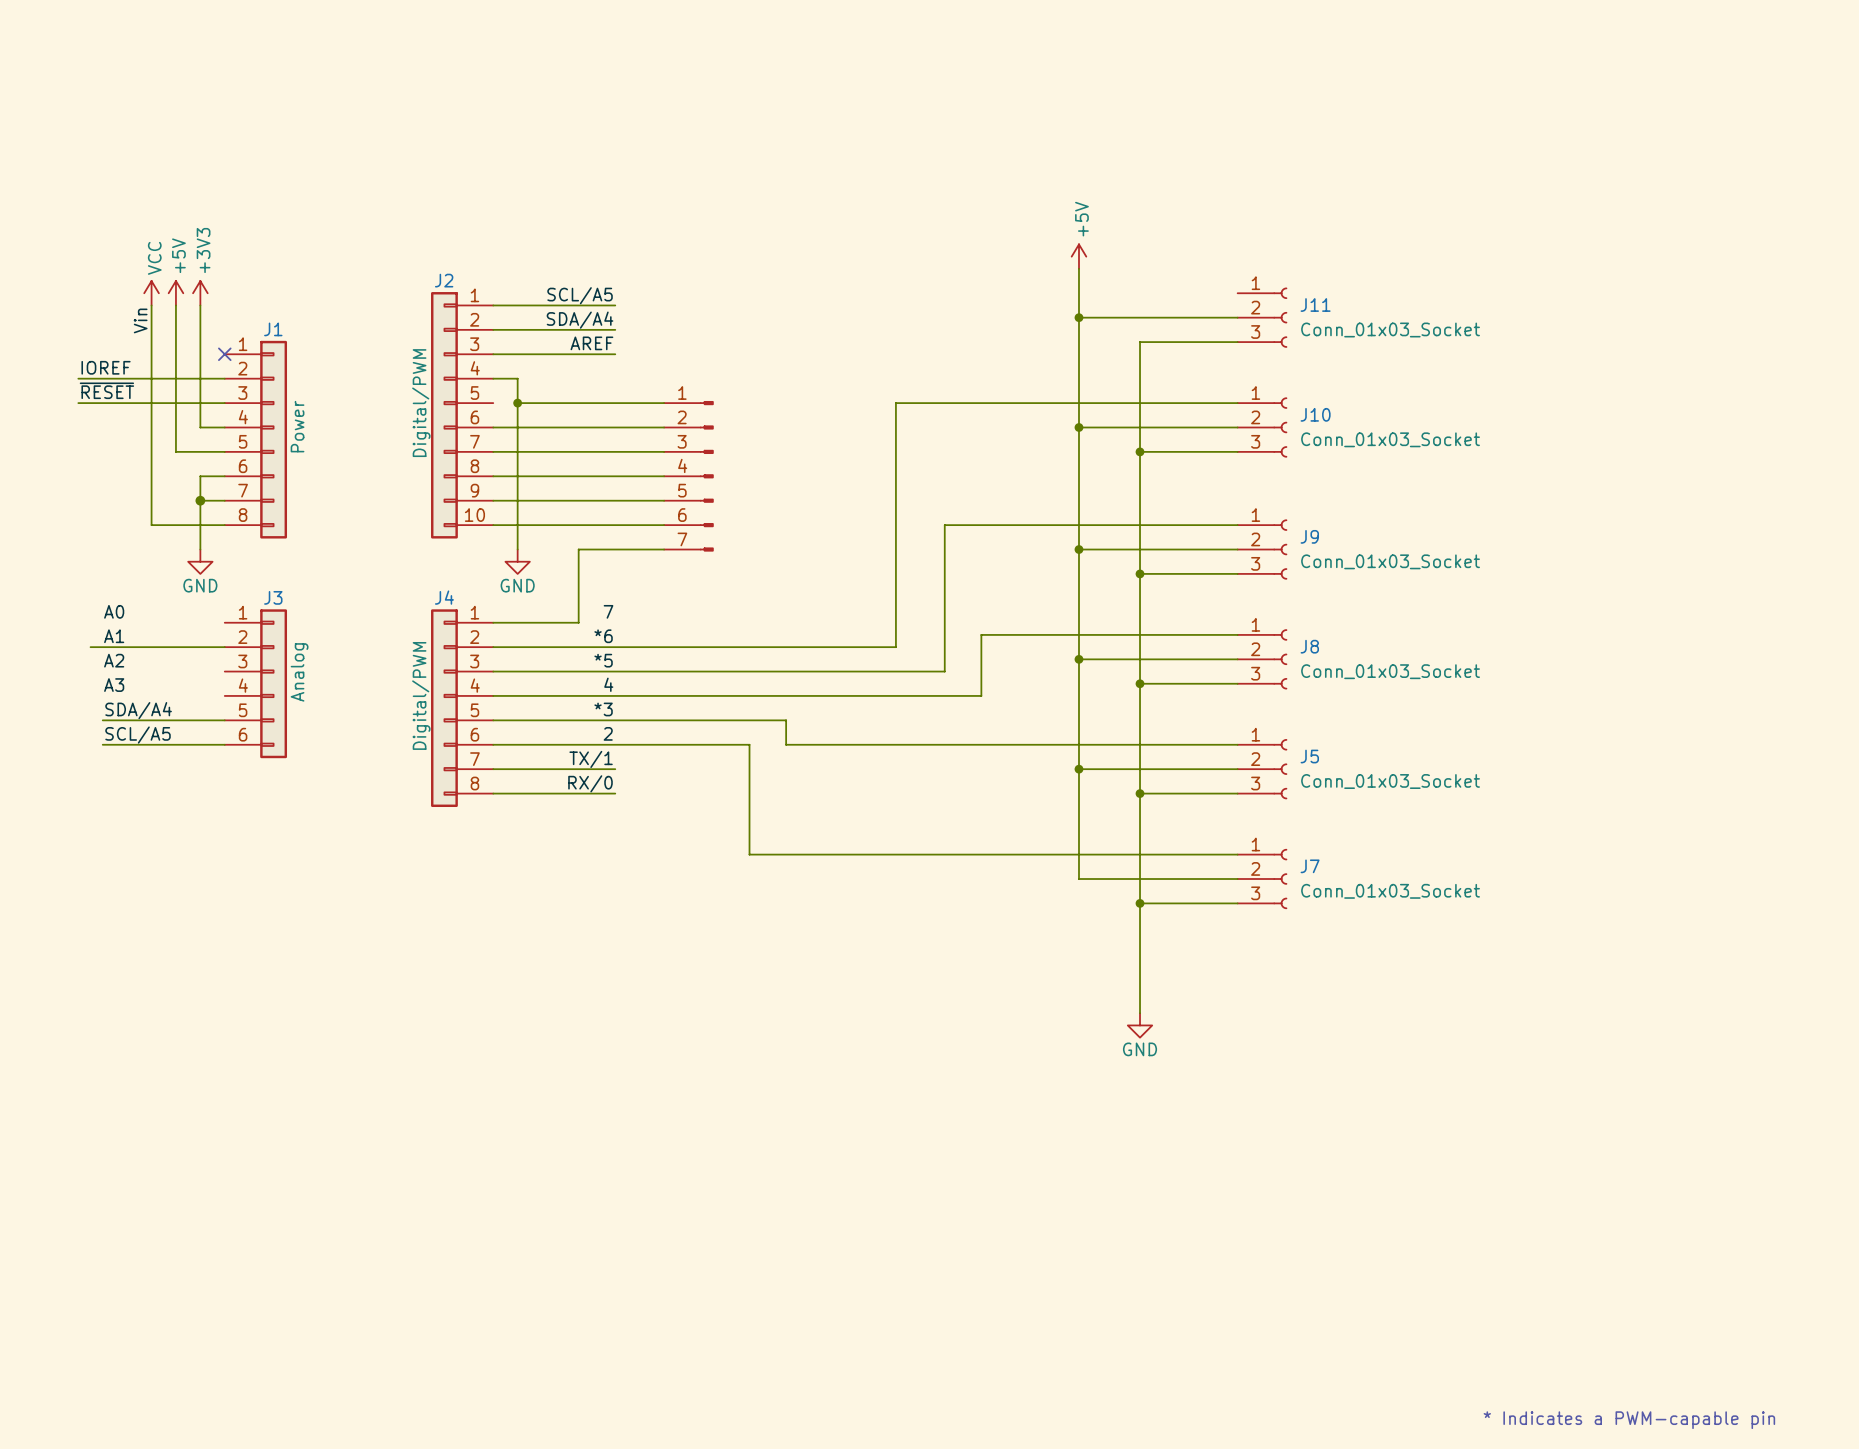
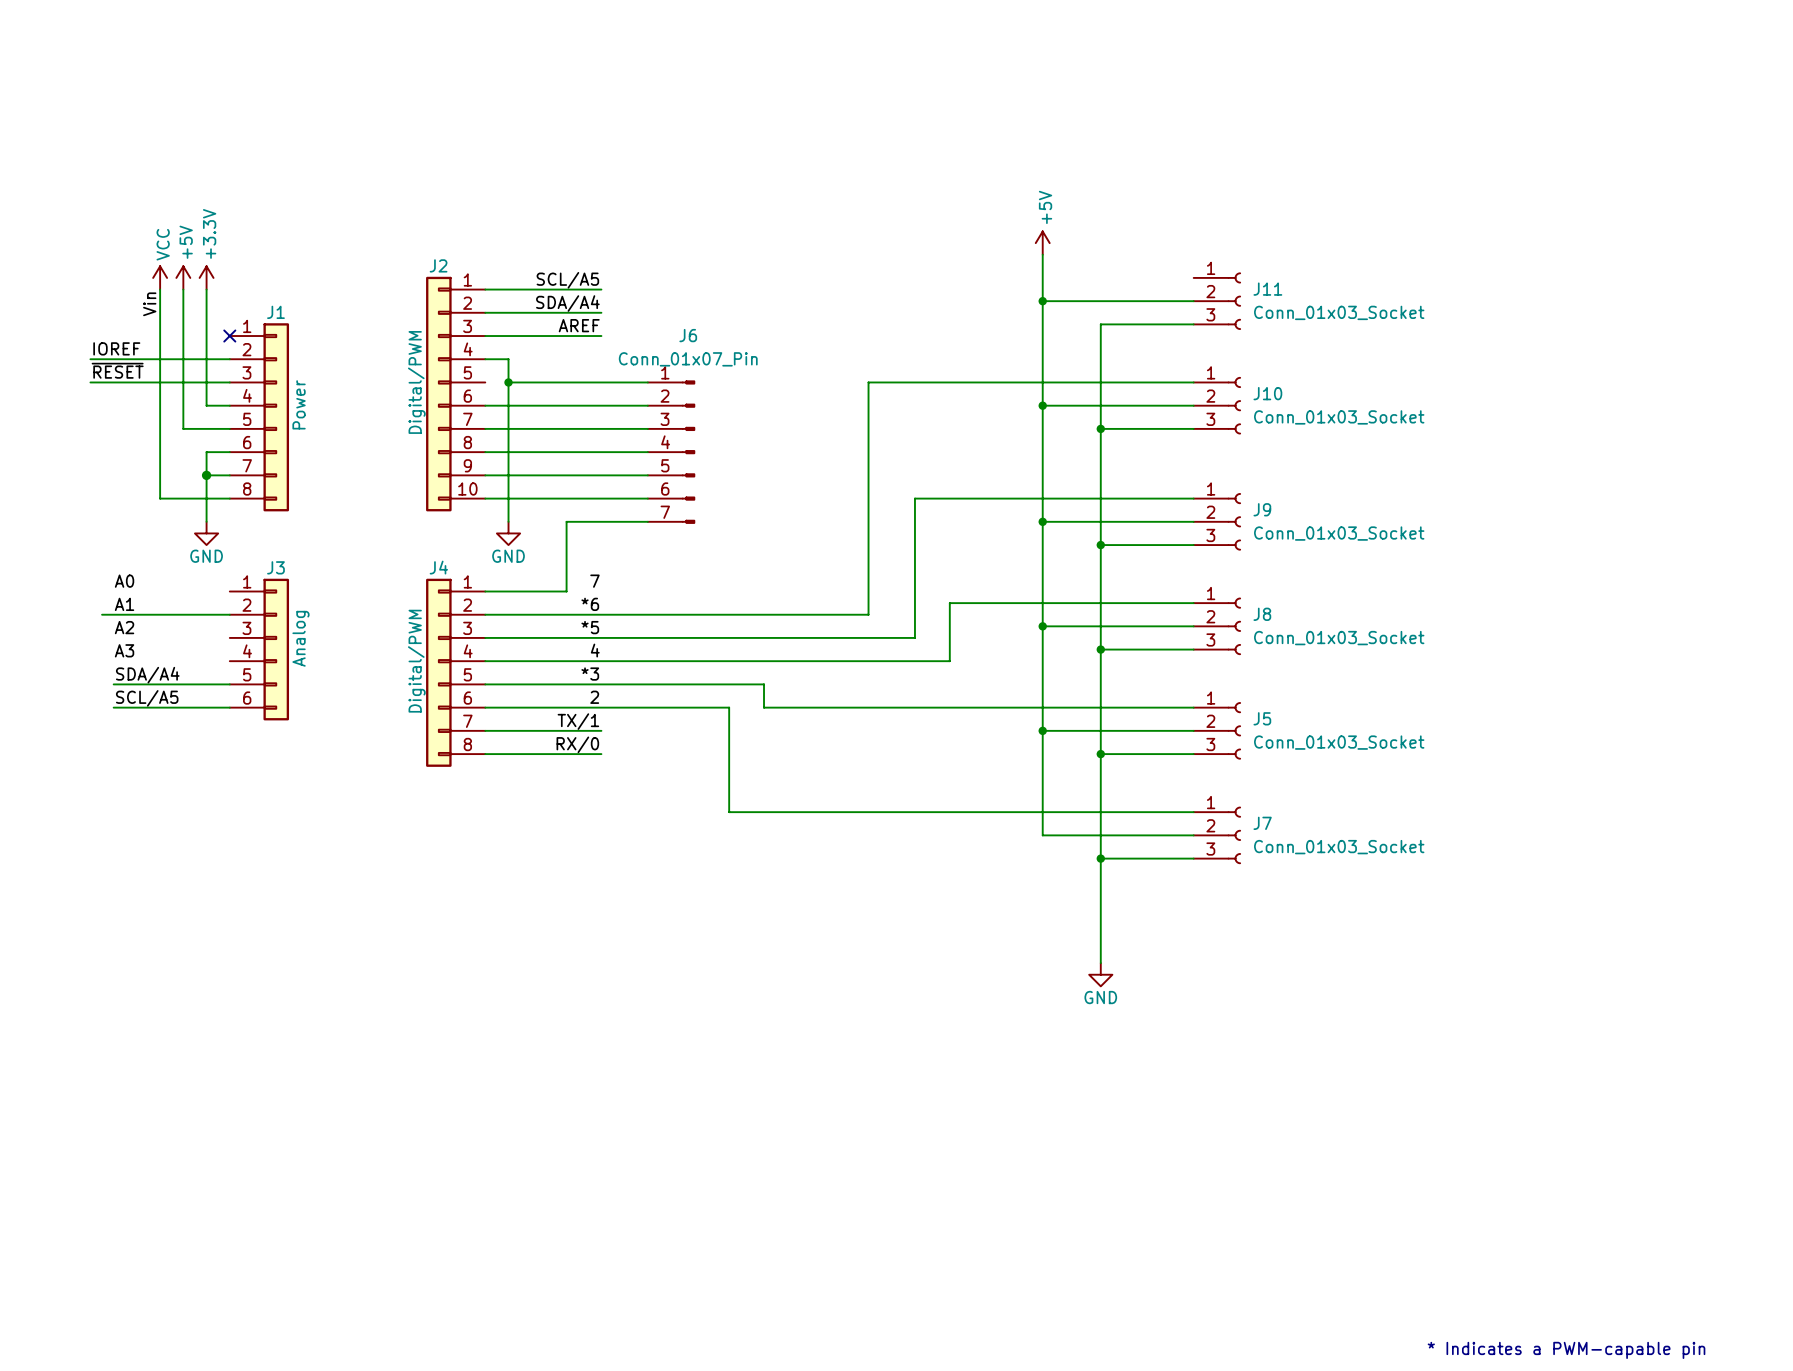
power symbol: +3V3 (200, 293) -> +3.3V (206, 277)
J6 name: none -> J6 (688, 335)
J6 value: none -> Conn_01x07_Pin (688, 359)

